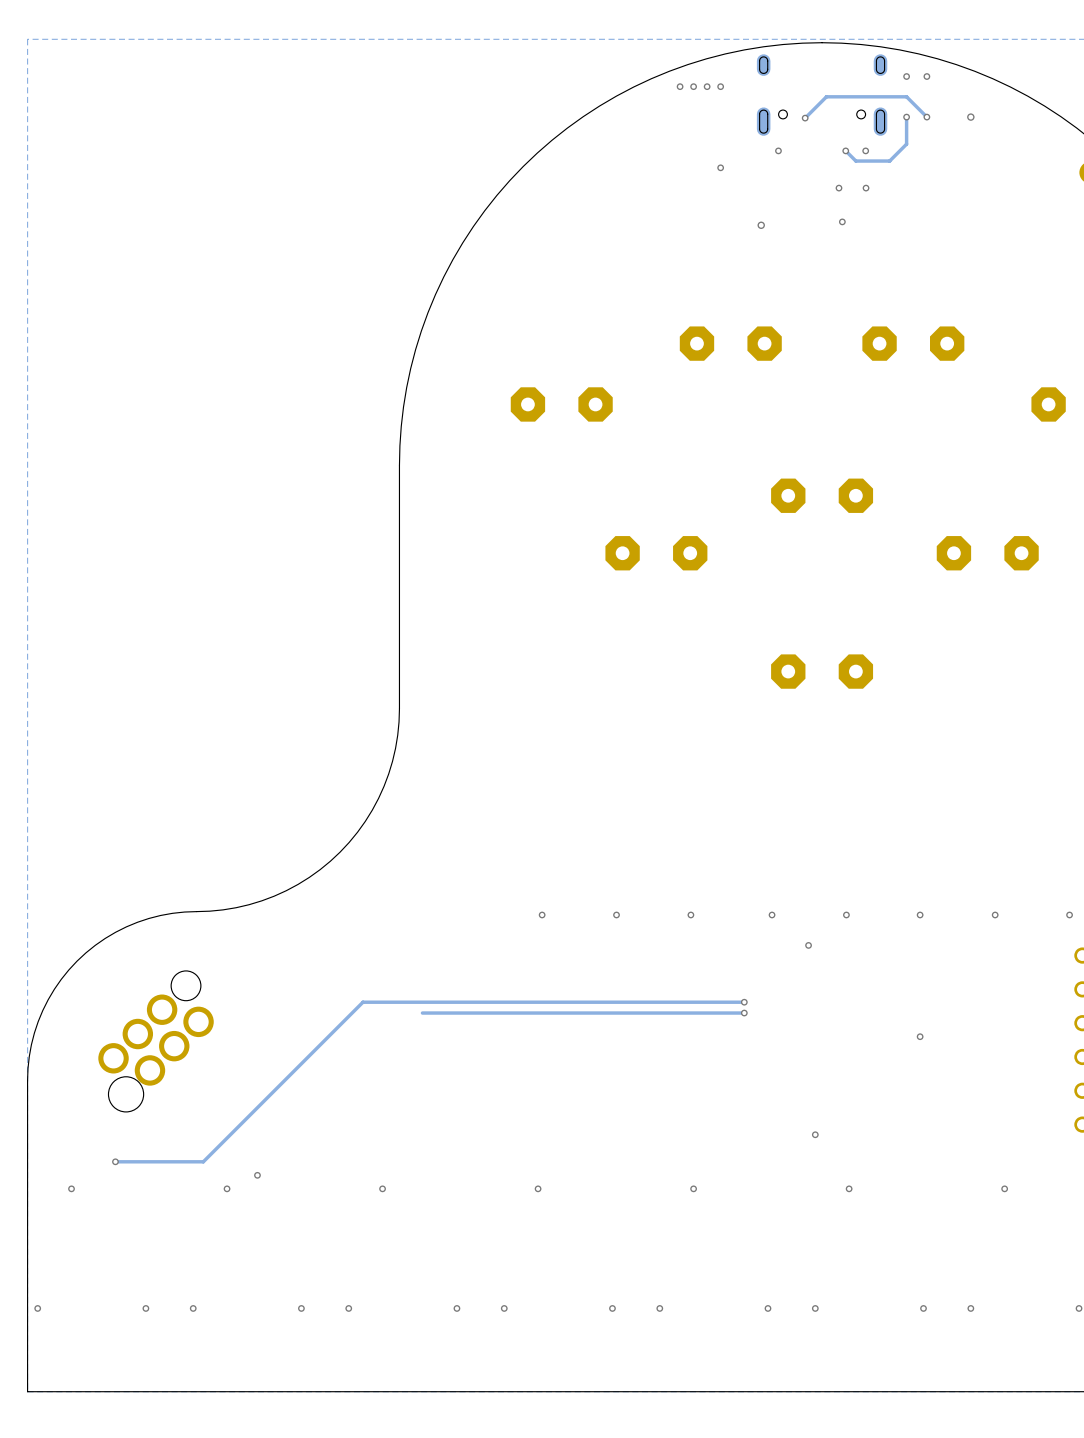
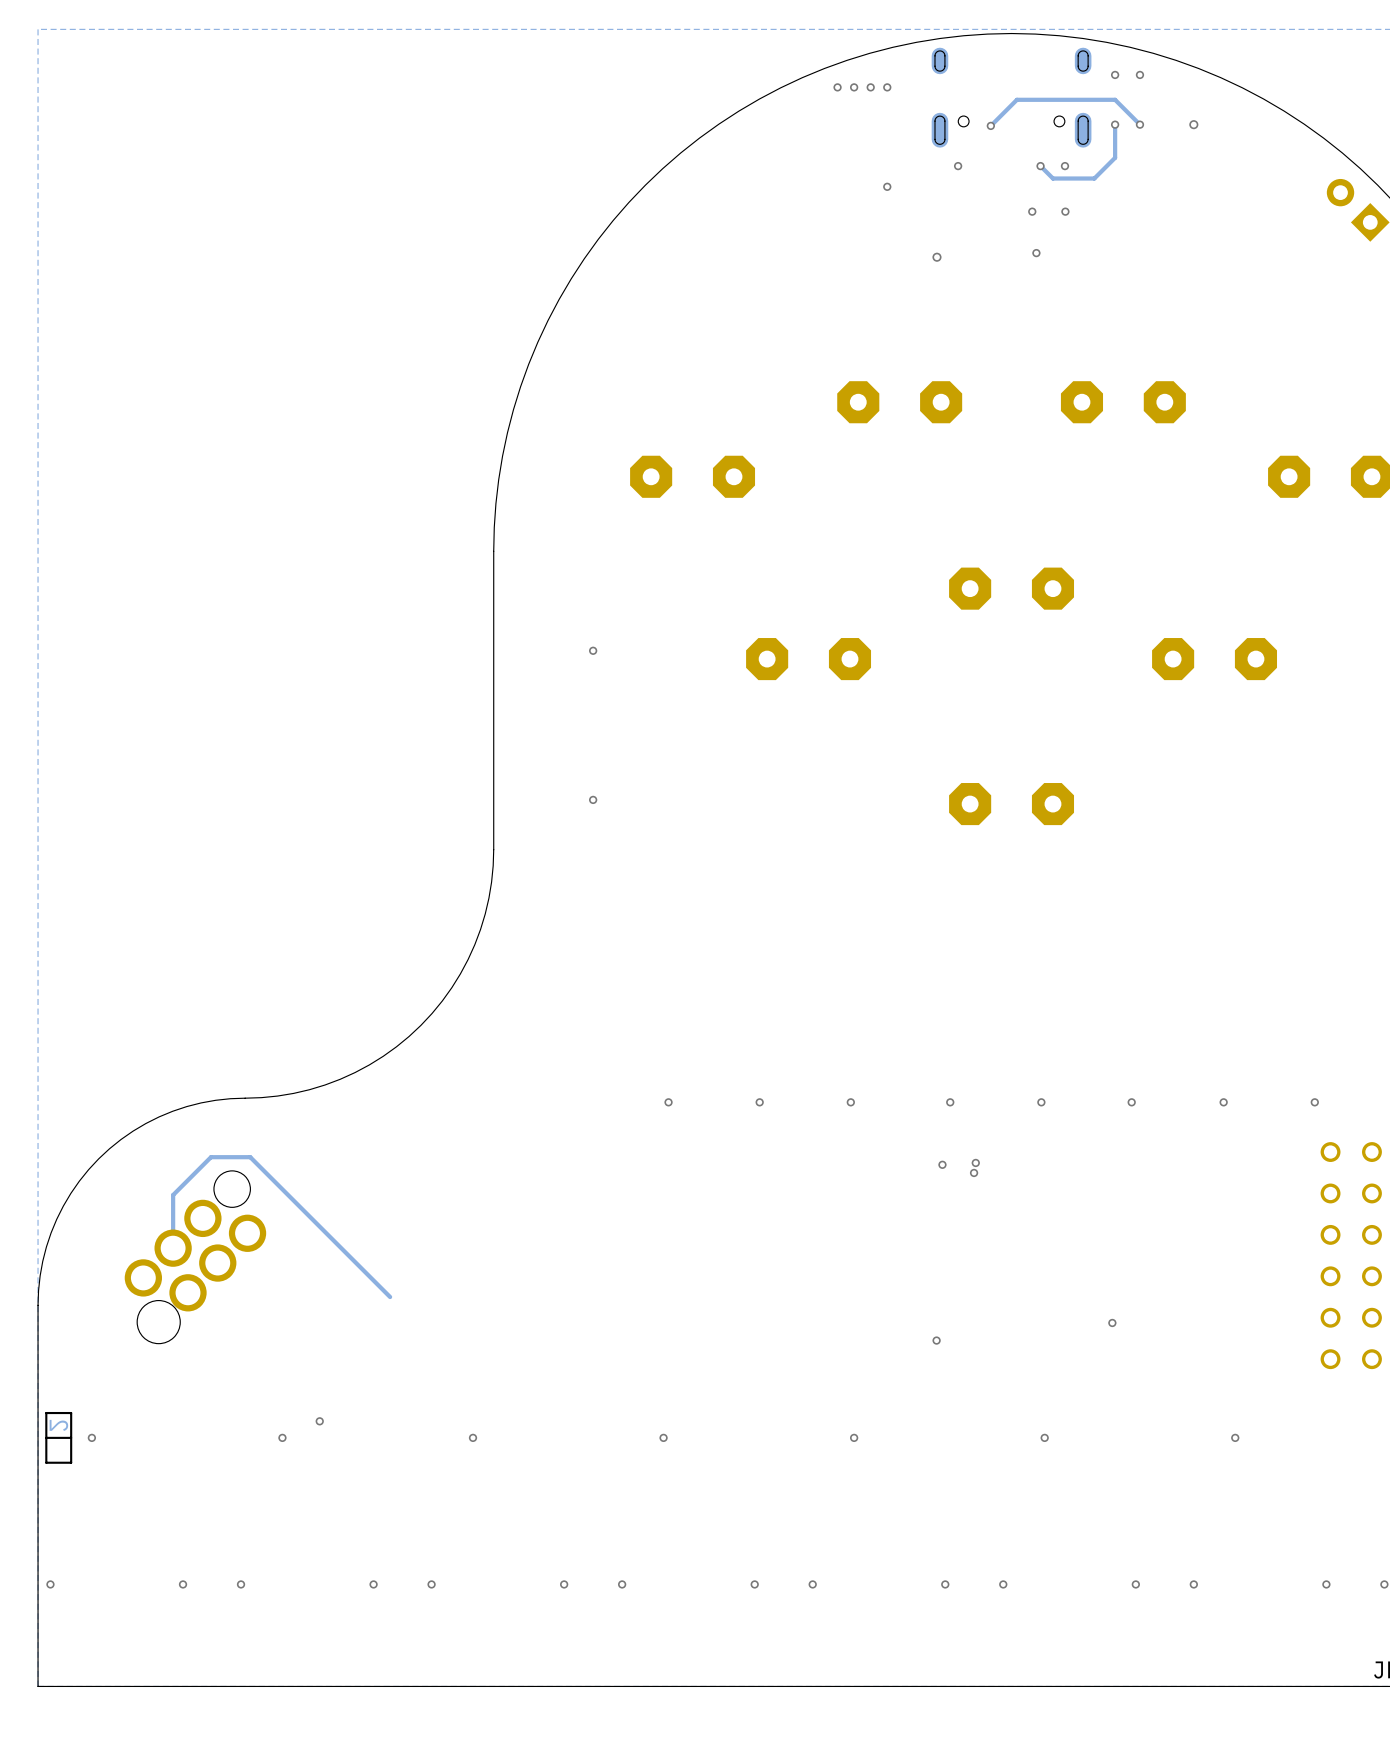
via: none -> (593, 650)
via: none -> (593, 799)
via: (808, 945) -> none
via: none -> (975, 1162)
via: none -> (942, 1164)
via: none -> (974, 1172)
track: (744, 1002) (362, 1002) (203, 1161) (115, 1161) -> none
via: (744, 1002) -> none
track: (744, 1013) (422, 1013) -> none
via: (744, 1013) -> none
track: none -> (173, 1248) (173, 1195) (211, 1157) (250, 1157) (390, 1297)
via: (920, 1036) -> none
via: none -> (1112, 1322)
via: none -> (936, 1340)
via: (815, 1134) -> none
via: (115, 1161) -> none
drawing: none -> [45, 1411, 73, 1464]

